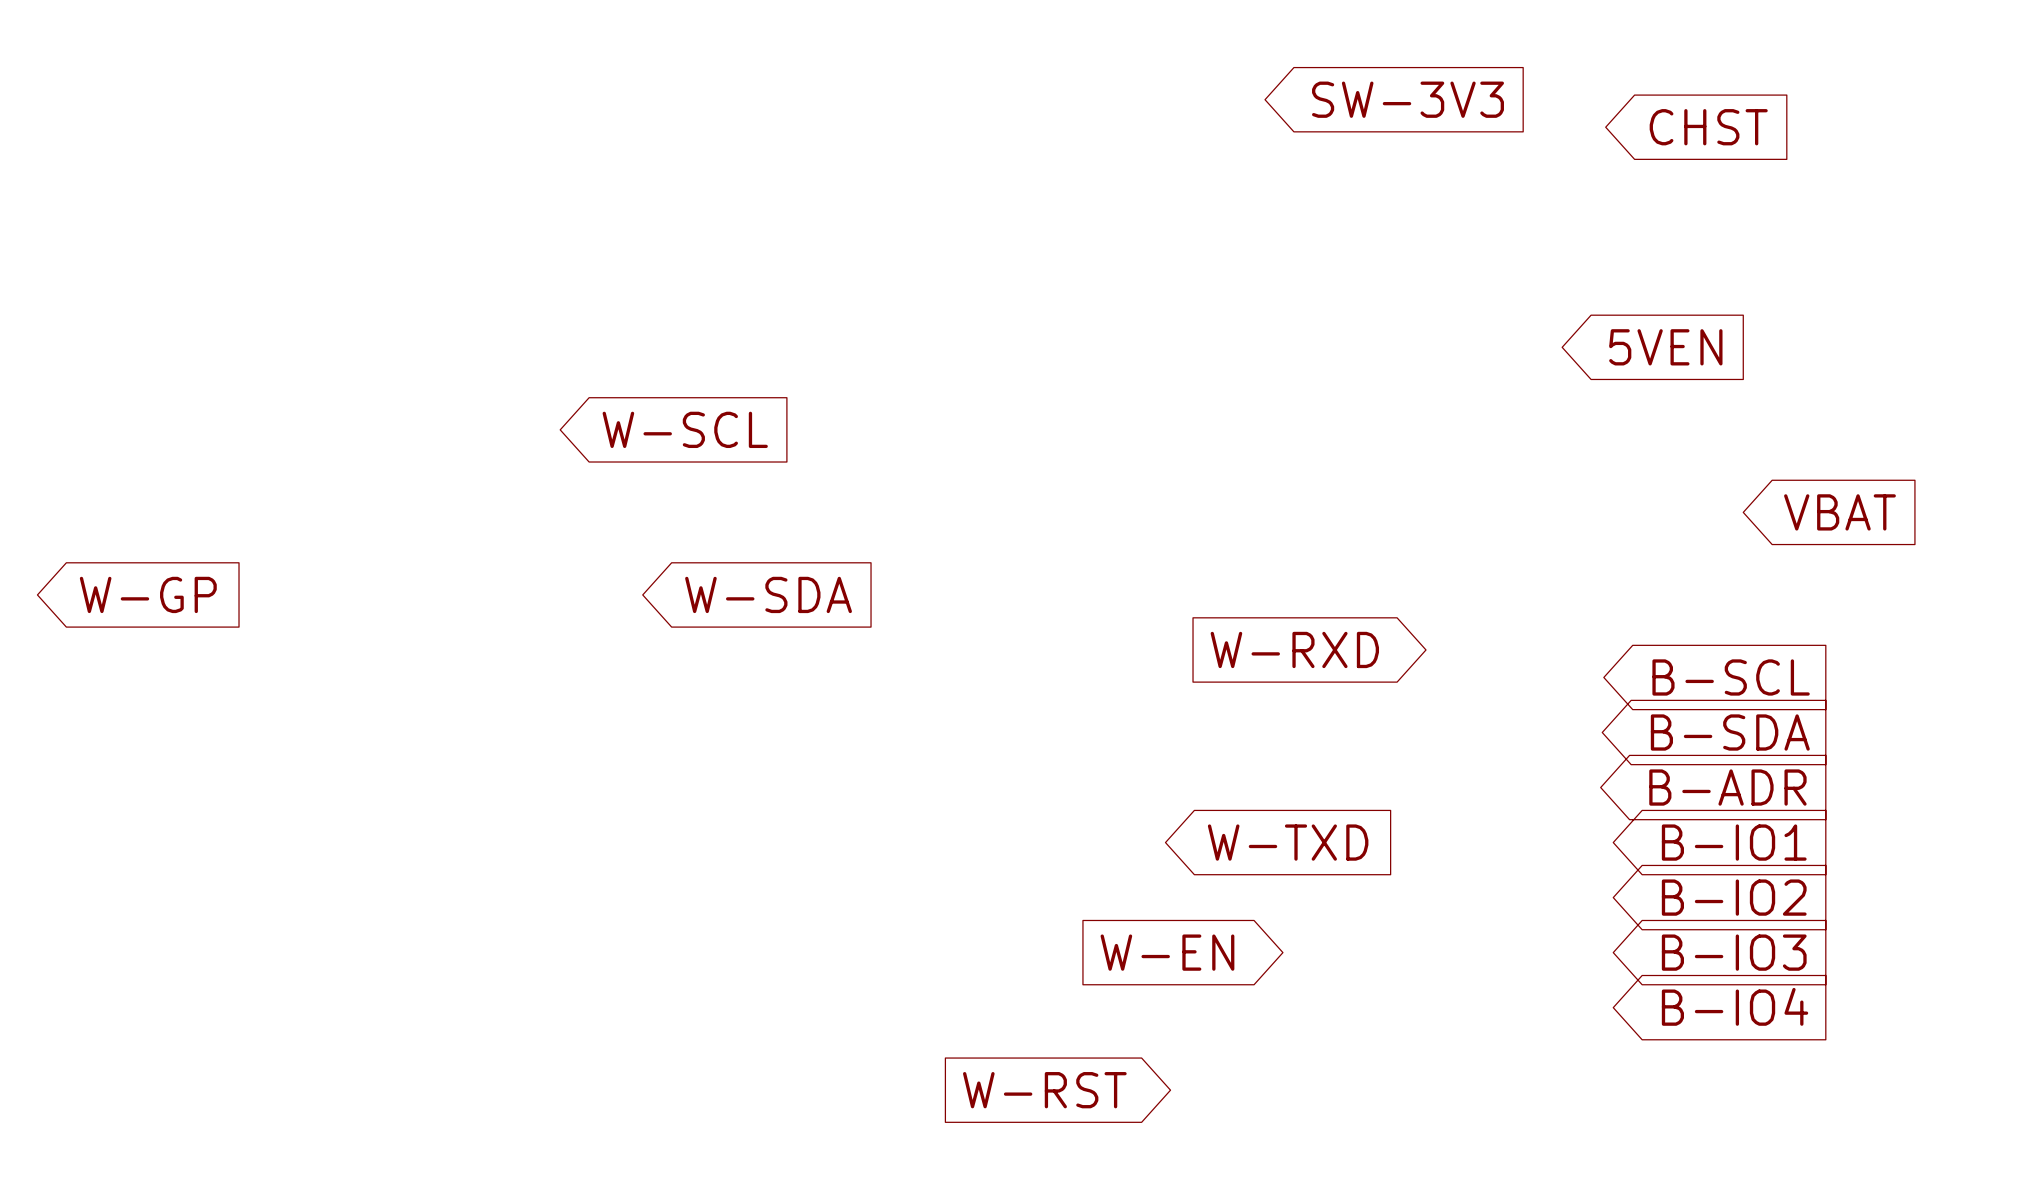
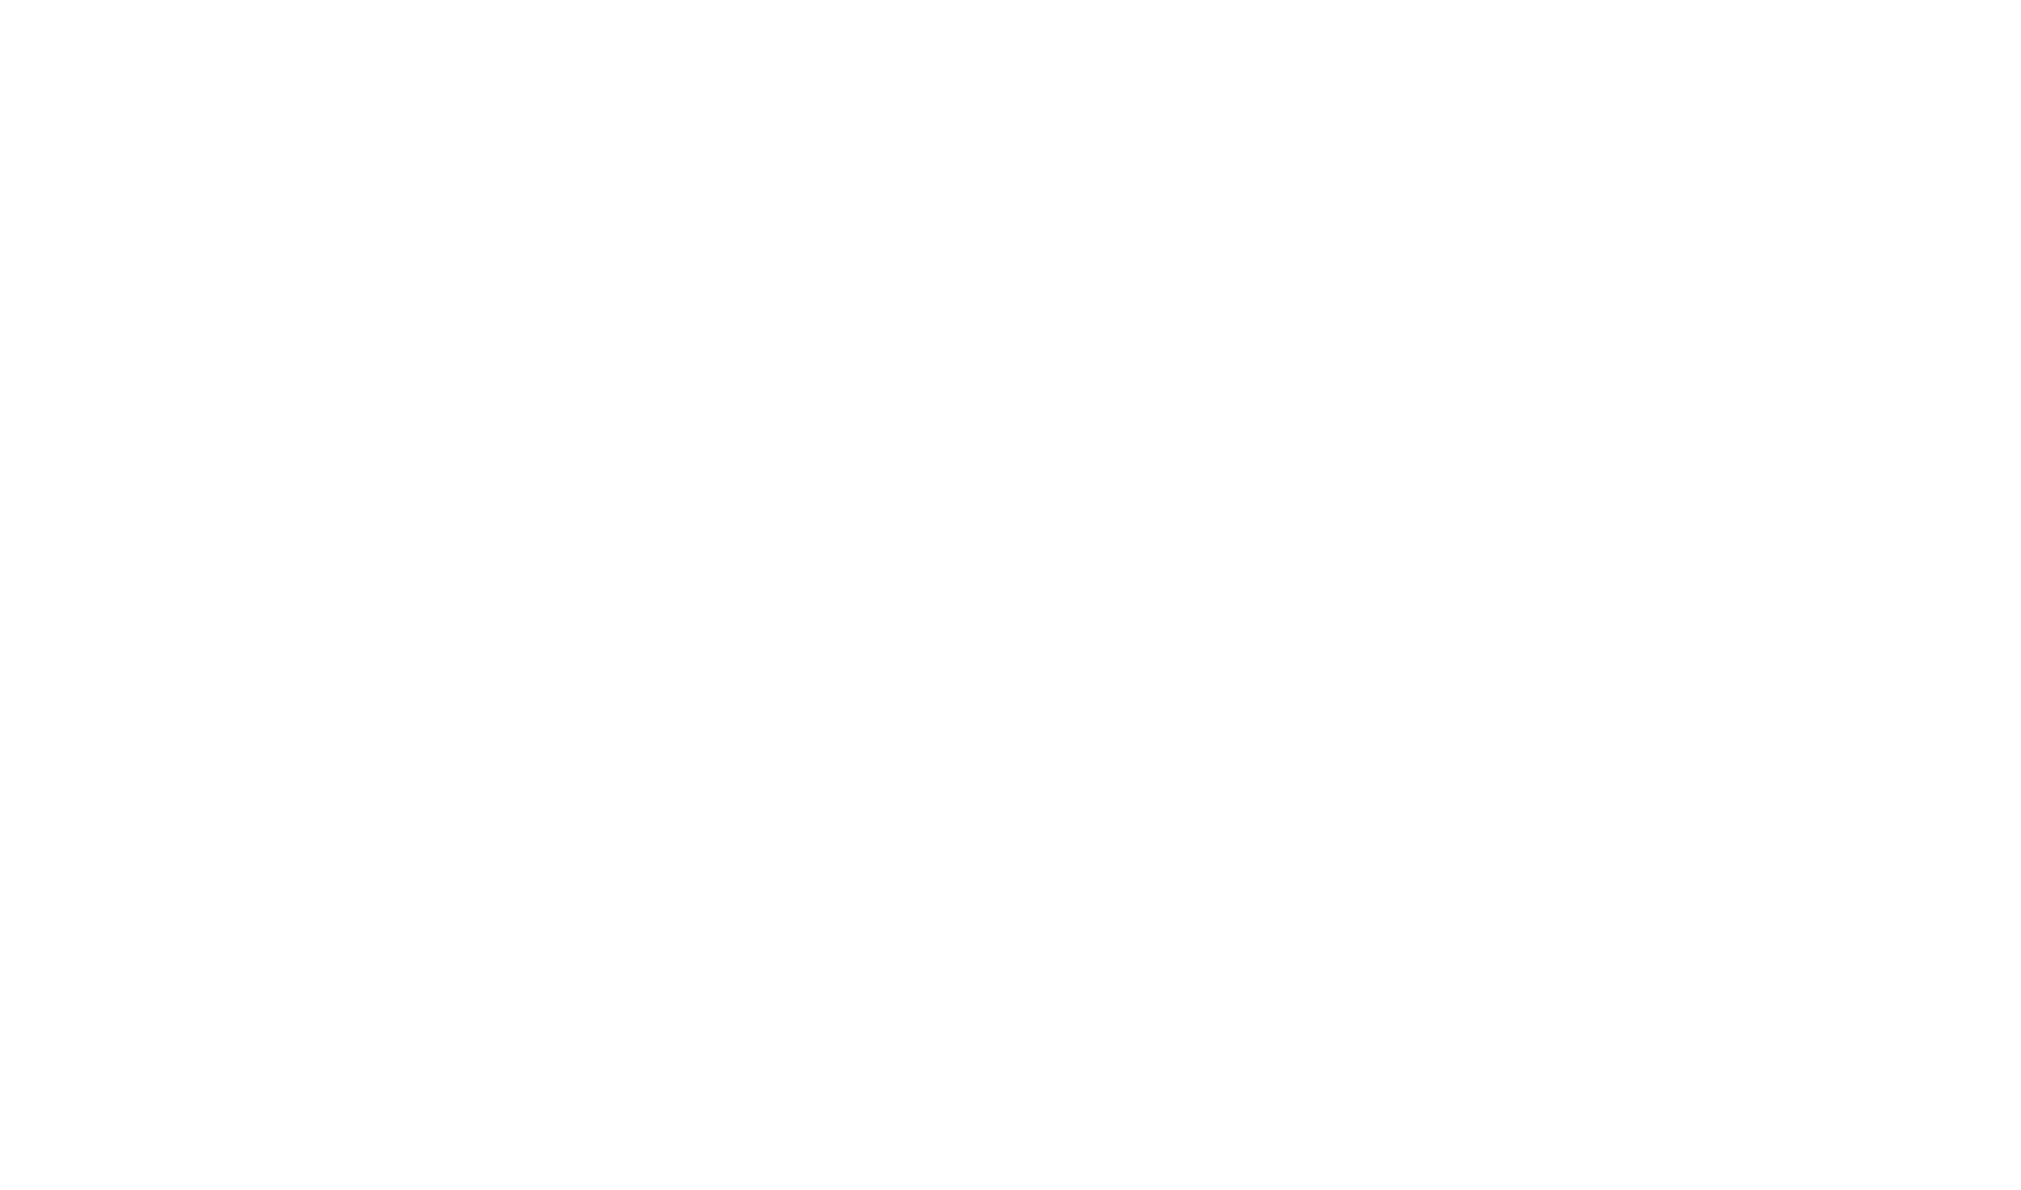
global label: SW-3V3 (1408, 99) -> none
global label: CHST (1708, 127) -> none
global label: 5VEN (1665, 347) -> none
global label: W-SCL (685, 429) -> none
global label: VBAT (1839, 512) -> none
global label: W-GP (148, 594) -> none
global label: W-SDA (768, 594) -> none
global label: W-RXD (1294, 649) -> none
global label: B-SCL (1731, 677) -> none
global label: B-SDA (1730, 732) -> none
global label: B-ADR (1727, 787) -> none
global label: W-TXD (1288, 842) -> none
global label: B-IO1 (1734, 842) -> none
global label: B-IO2 (1734, 897) -> none
global label: W-EN (1167, 952) -> none
global label: B-IO3 (1734, 952) -> none
global label: B-IO4 (1735, 1006) -> none
global label: W-RST (1044, 1090) -> none

